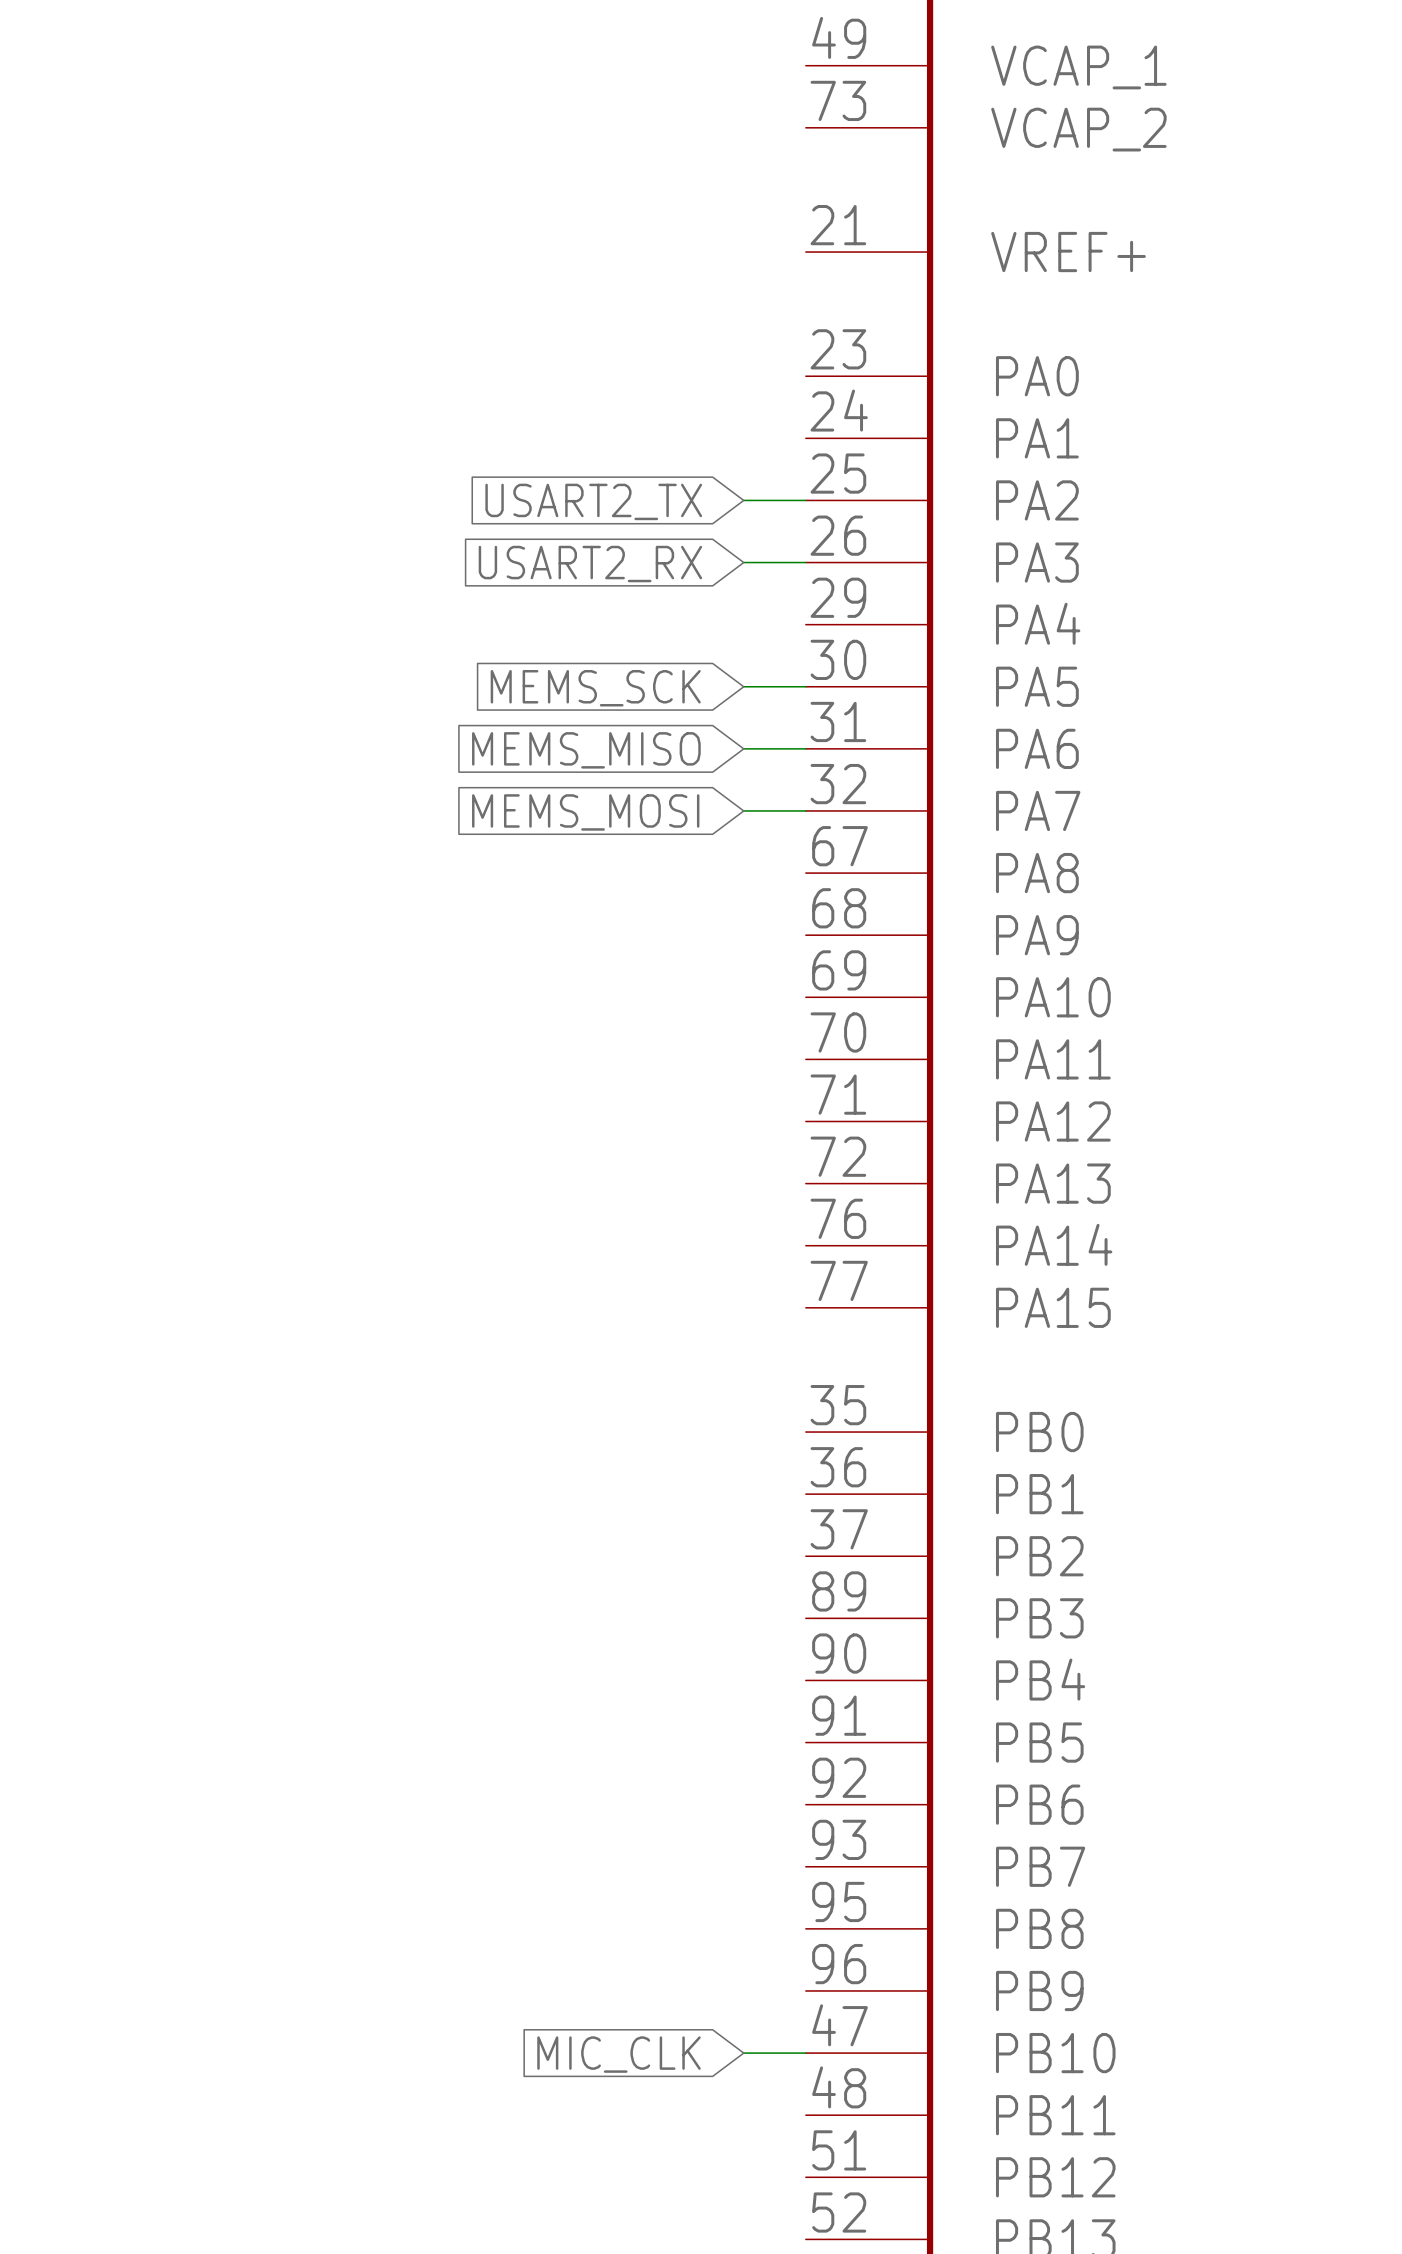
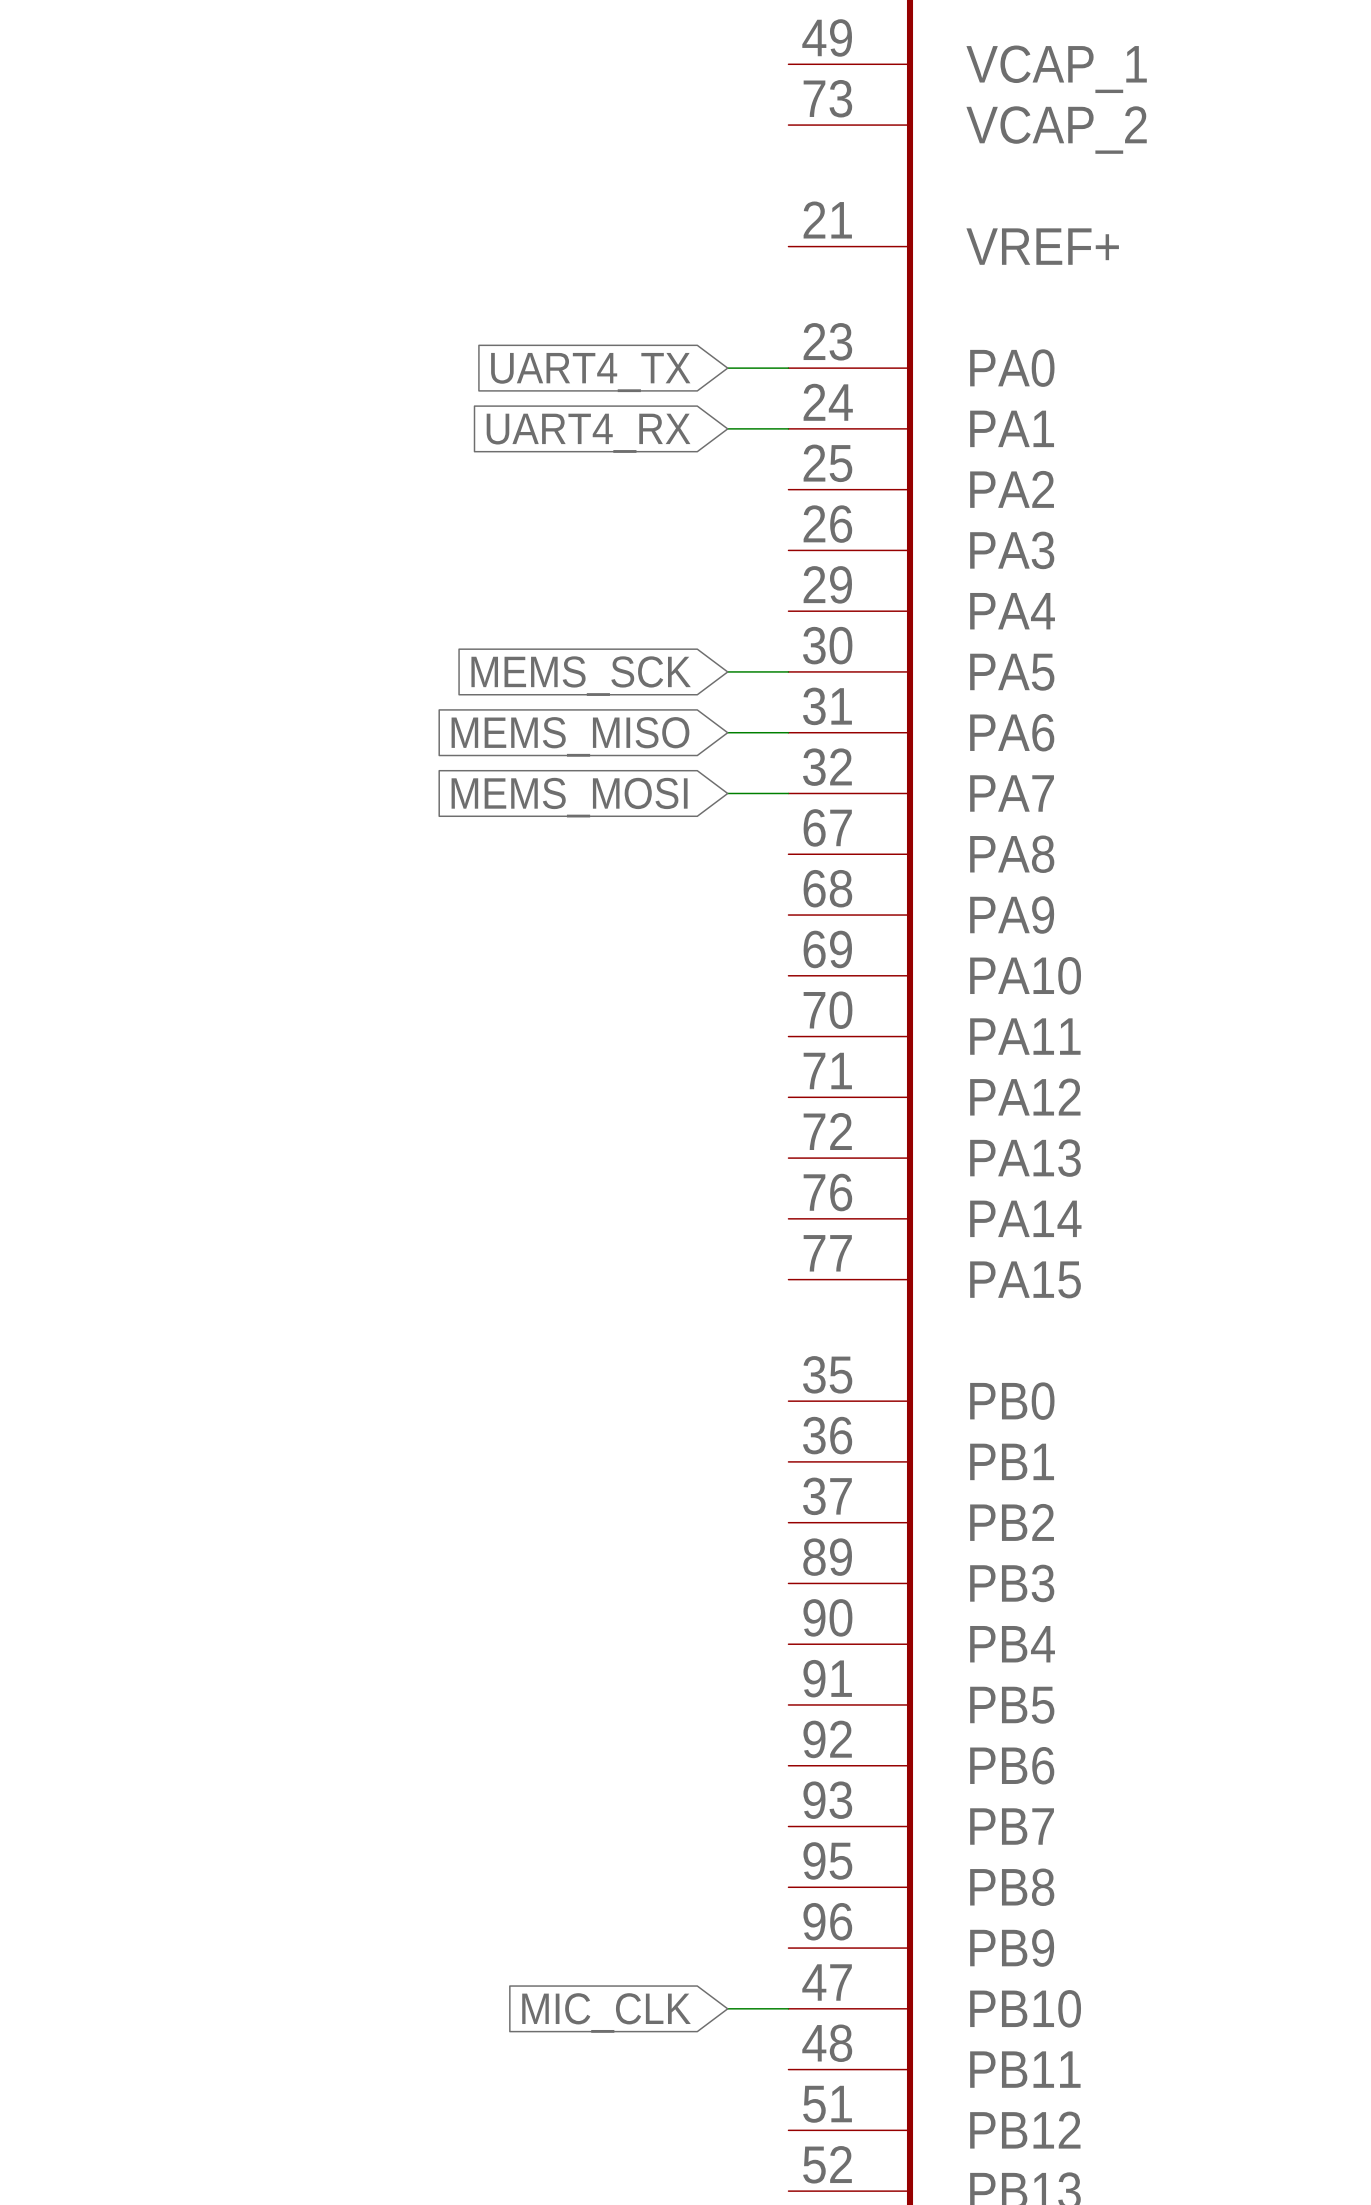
global label: none -> UART4_TX (590, 372)
wire: (743, 500) (805, 500) -> (727, 428) (788, 428)
global label: USART2_TX (593, 501) -> UART4_RX (588, 433)
wire: (743, 562) (805, 562) -> (727, 368) (788, 368)
global label: USART2_RX (590, 564) -> none

